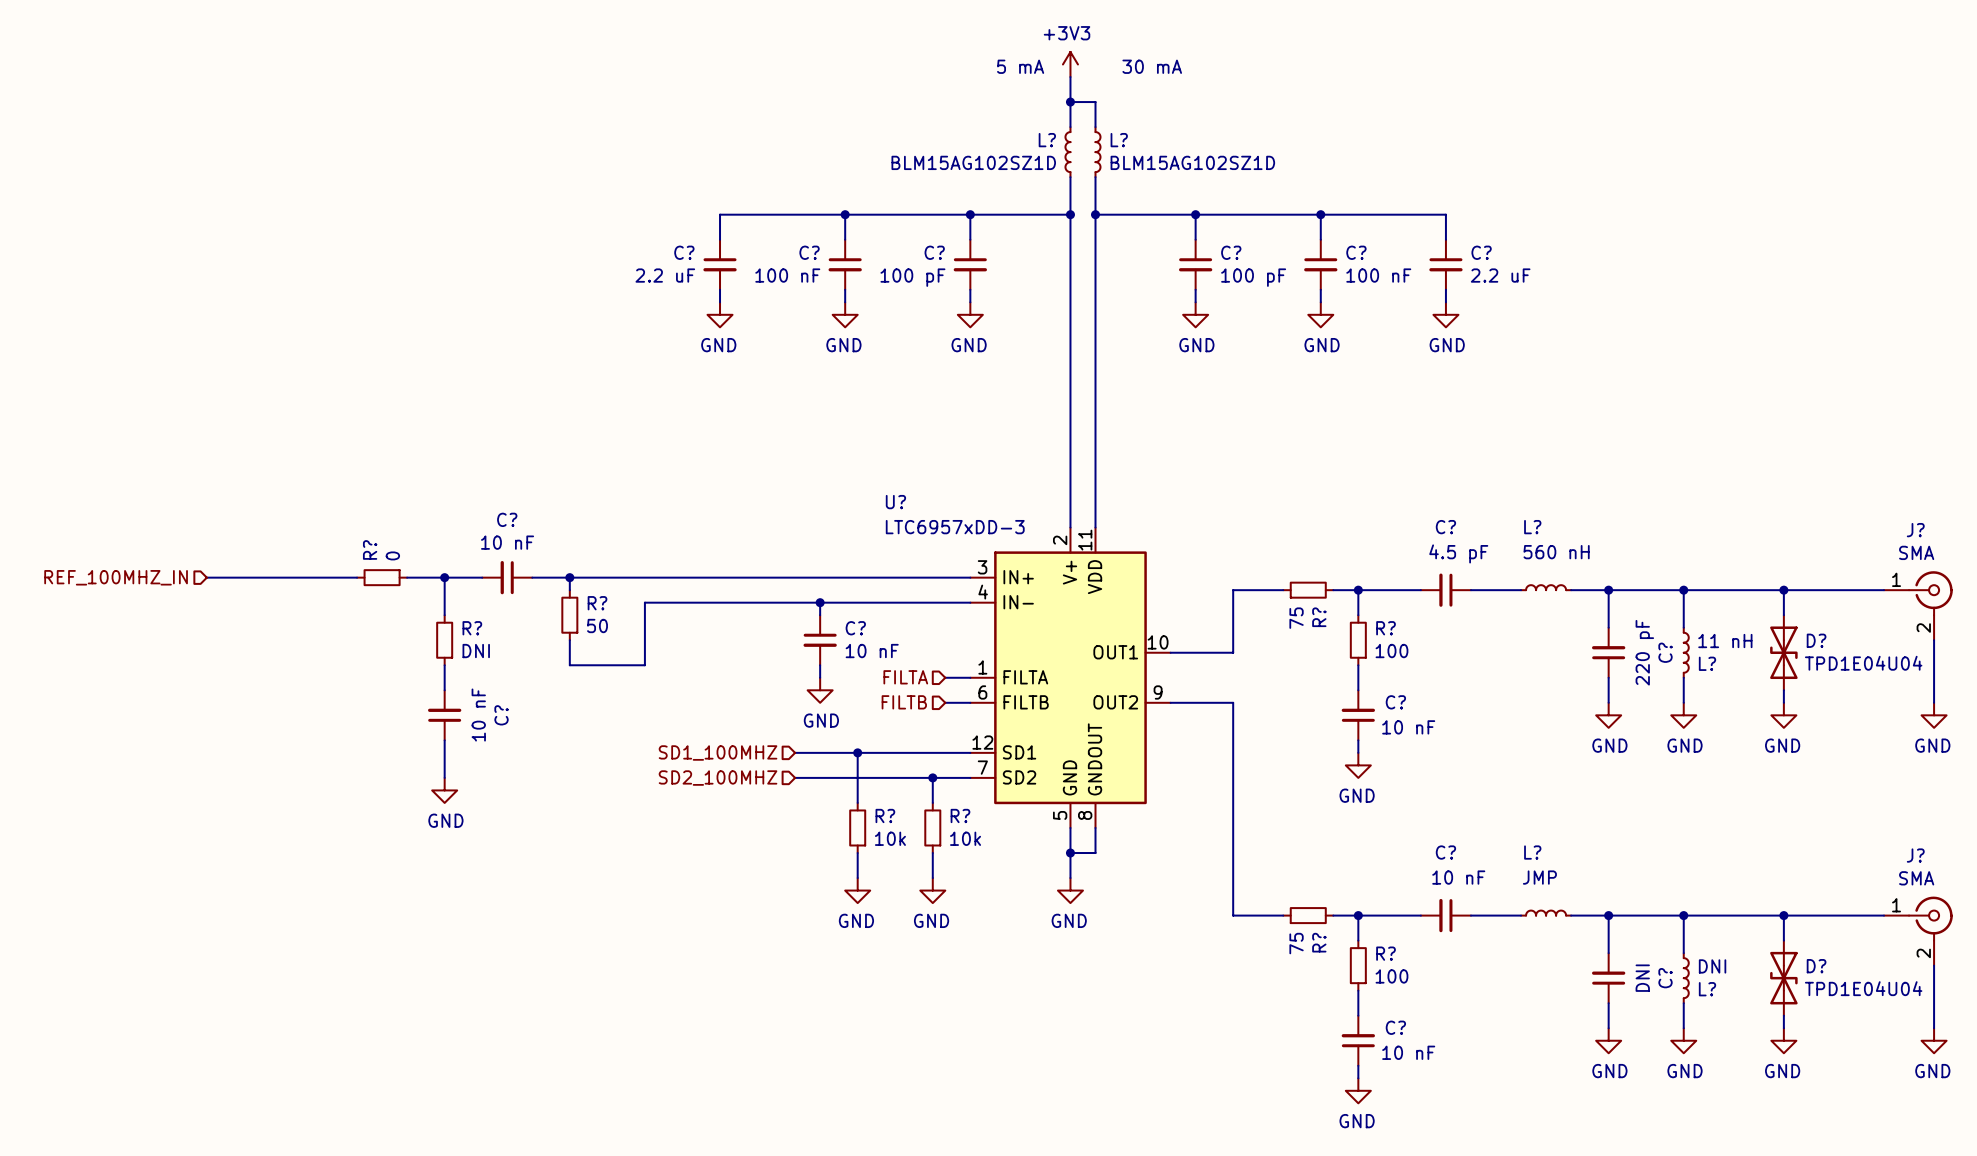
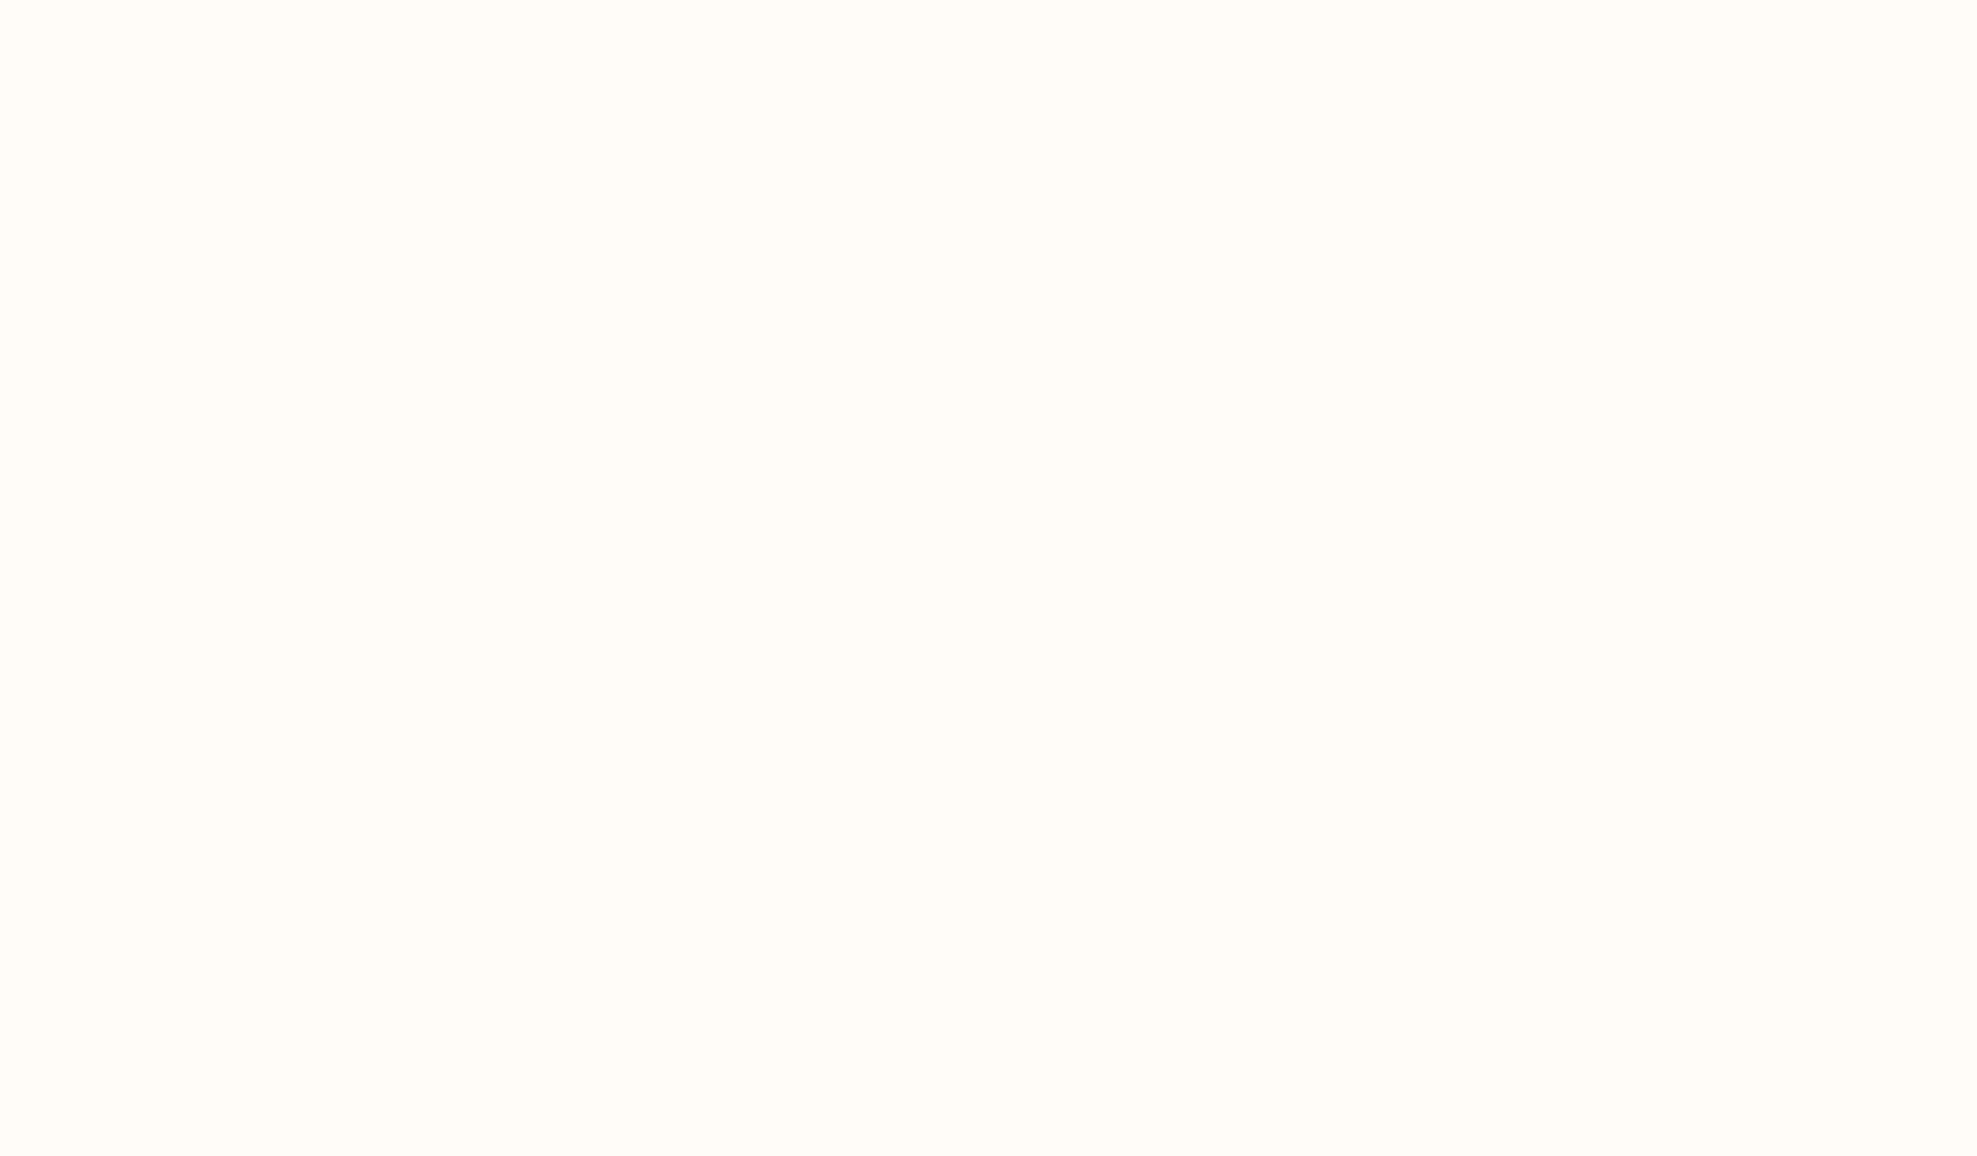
power symbol: +3V3 (1070, 64) -> none
text: 5 mA (1020, 66) -> none
text: 30 mA (1152, 66) -> none
wire: (1070, 77) (1070, 127) -> none
wire: (1070, 102) (1095, 102) (1095, 127) -> none
junction: (1070, 102) -> none
L?: BLM15AG102SZ1D (1067, 152) -> none
L?: BLM15AG102SZ1D (1098, 152) -> none
wire: (1070, 177) (1070, 527) -> none
wire: (1095, 177) (1095, 527) -> none
wire: (845, 214) (845, 239) -> none
junction: (845, 214) -> none
wire: (970, 214) (970, 239) -> none
junction: (970, 214) -> none
wire: (1070, 214) (720, 214) (720, 239) -> none
junction: (1070, 214) -> none
wire: (1095, 214) (1445, 214) (1445, 239) -> none
junction: (1095, 214) -> none
wire: (1195, 214) (1195, 239) -> none
junction: (1195, 214) -> none
wire: (1320, 214) (1320, 239) -> none
junction: (1320, 214) -> none
C?: 2.2 uF (720, 264) -> none
C?: 100 nF (845, 264) -> none
C?: 100 pF (970, 264) -> none
C?: 100 pF (1195, 264) -> none
C?: 100 nF (1320, 264) -> none
C?: 2.2 uF (1445, 264) -> none
wire: (720, 289) (720, 302) -> none
wire: (845, 289) (845, 302) -> none
wire: (970, 289) (970, 302) -> none
wire: (1195, 289) (1195, 302) -> none
wire: (1320, 289) (1320, 302) -> none
wire: (1445, 289) (1445, 302) -> none
power symbol: GND (720, 314) -> none
power symbol: GND (845, 314) -> none
power symbol: GND (970, 314) -> none
power symbol: GND (1195, 314) -> none
power symbol: GND (1320, 314) -> none
power symbol: GND (1445, 314) -> none
hierarchical label: REF_100MHZ_IN (116, 577) -> none
wire: (206, 577) (357, 577) -> none
R?: 0 (382, 577) -> none
wire: (407, 577) (482, 577) -> none
wire: (444, 577) (444, 615) -> none
junction: (444, 577) -> none
C?: 10 nF (507, 577) -> none
wire: (532, 577) (970, 577) -> none
wire: (569, 577) (569, 590) -> none
junction: (569, 577) -> none
L?: 560 nH (1546, 587) -> none
wire: (1283, 590) (1233, 590) (1233, 652) (1170, 652) -> none
R?: 75 (1308, 590) -> none
wire: (1333, 590) (1420, 590) -> none
wire: (1358, 590) (1358, 615) -> none
junction: (1358, 590) -> none
C?: 4.5 pF (1445, 590) -> none
wire: (1470, 590) (1521, 590) -> none
wire: (1571, 590) (1884, 590) -> none
wire: (1608, 590) (1608, 627) -> none
junction: (1608, 590) -> none
wire: (1683, 590) (1683, 627) -> none
junction: (1683, 590) -> none
wire: (1783, 590) (1783, 615) -> none
junction: (1783, 590) -> none
wire: (820, 602) (820, 615) -> none
junction: (820, 602) -> none
wire: (970, 602) (644, 602) (644, 665) (569, 665) (569, 640) -> none
J?: SMA (1918, 605) -> none
R?: 50 (569, 615) -> none
R?: DNI (444, 640) -> none
C?: 10 nF (820, 640) -> none
R?: 100 (1358, 640) -> none
wire: (1934, 640) (1934, 702) -> none
C?: 220 pF (1608, 652) -> none
L?: 11 nH (1686, 652) -> none
D?: TPD1E04U04 (1783, 652) -> none
wire: (444, 665) (444, 690) -> none
wire: (820, 665) (820, 677) -> none
wire: (1358, 665) (1358, 690) -> none
hierarchical label: FILTA (905, 677) -> none
wire: (945, 677) (970, 677) -> none
U?: LTC6957xDD-3 (1070, 677) -> none
wire: (1608, 677) (1608, 702) -> none
wire: (1683, 677) (1683, 702) -> none
power symbol: GND (820, 690) -> none
wire: (1783, 690) (1783, 702) -> none
hierarchical label: FILTB (904, 702) -> none
wire: (945, 702) (970, 702) -> none
wire: (1170, 702) (1233, 702) (1233, 915) (1283, 915) -> none
C?: 10 nF (444, 715) -> none
C?: 10 nF (1358, 715) -> none
power symbol: GND (1608, 715) -> none
power symbol: GND (1683, 715) -> none
power symbol: GND (1783, 715) -> none
power symbol: GND (1934, 715) -> none
wire: (444, 740) (444, 777) -> none
wire: (1358, 740) (1358, 752) -> none
wire: (795, 752) (970, 752) -> none
wire: (857, 752) (857, 802) -> none
junction: (857, 752) -> none
hierarchical label: SD1_100MHZ (718, 753) -> none
power symbol: GND (1358, 765) -> none
wire: (795, 777) (970, 777) -> none
wire: (932, 777) (932, 802) -> none
junction: (932, 777) -> none
hierarchical label: SD2_100MHZ (718, 778) -> none
power symbol: GND (444, 790) -> none
R?: 10k (857, 827) -> none
R?: 10k (932, 827) -> none
wire: (1070, 827) (1070, 878) -> none
wire: (1095, 827) (1095, 853) (1070, 853) -> none
wire: (857, 853) (857, 878) -> none
wire: (932, 853) (932, 878) -> none
junction: (1070, 853) -> none
power symbol: GND (857, 890) -> none
power symbol: GND (932, 890) -> none
power symbol: GND (1070, 890) -> none
L?: JMP (1546, 913) -> none
R?: 75 (1308, 915) -> none
wire: (1333, 915) (1420, 915) -> none
wire: (1358, 915) (1358, 940) -> none
junction: (1358, 915) -> none
C?: 10 nF (1445, 915) -> none
wire: (1470, 915) (1521, 915) -> none
wire: (1571, 915) (1884, 915) -> none
wire: (1608, 915) (1608, 953) -> none
junction: (1608, 915) -> none
wire: (1683, 915) (1683, 953) -> none
junction: (1683, 915) -> none
wire: (1783, 915) (1783, 940) -> none
junction: (1783, 915) -> none
J?: SMA (1918, 931) -> none
R?: 100 (1358, 965) -> none
wire: (1934, 965) (1934, 1028) -> none
C?: DNI (1608, 978) -> none
L?: DNI (1686, 978) -> none
D?: TPD1E04U04 (1783, 978) -> none
wire: (1358, 990) (1358, 1015) -> none
wire: (1608, 1003) (1608, 1028) -> none
wire: (1683, 1003) (1683, 1028) -> none
wire: (1783, 1015) (1783, 1028) -> none
C?: 10 nF (1358, 1040) -> none
power symbol: GND (1608, 1040) -> none
power symbol: GND (1683, 1040) -> none
power symbol: GND (1783, 1040) -> none
power symbol: GND (1934, 1040) -> none
wire: (1358, 1065) (1358, 1078) -> none
power symbol: GND (1358, 1090) -> none

